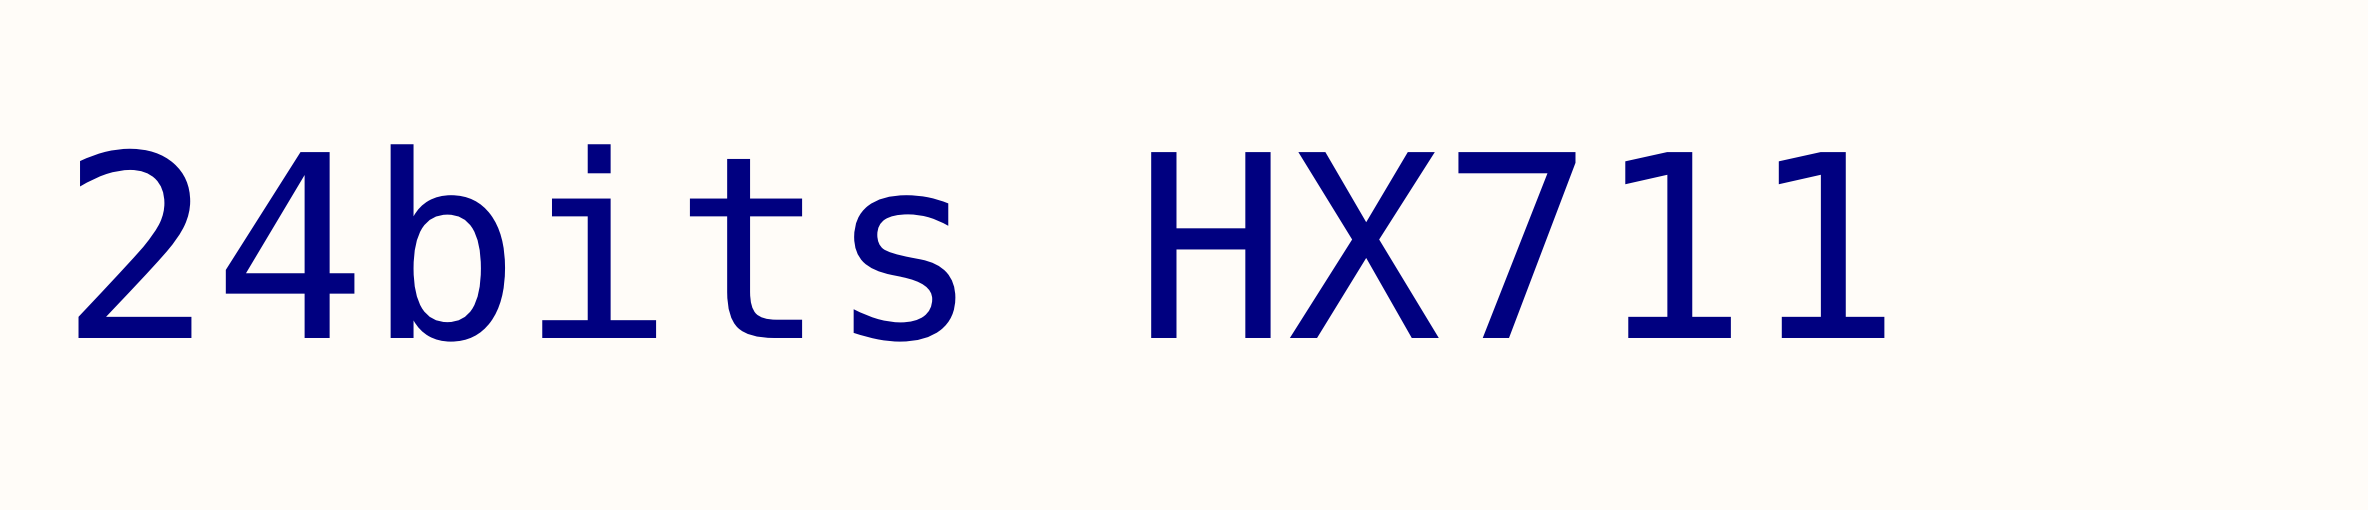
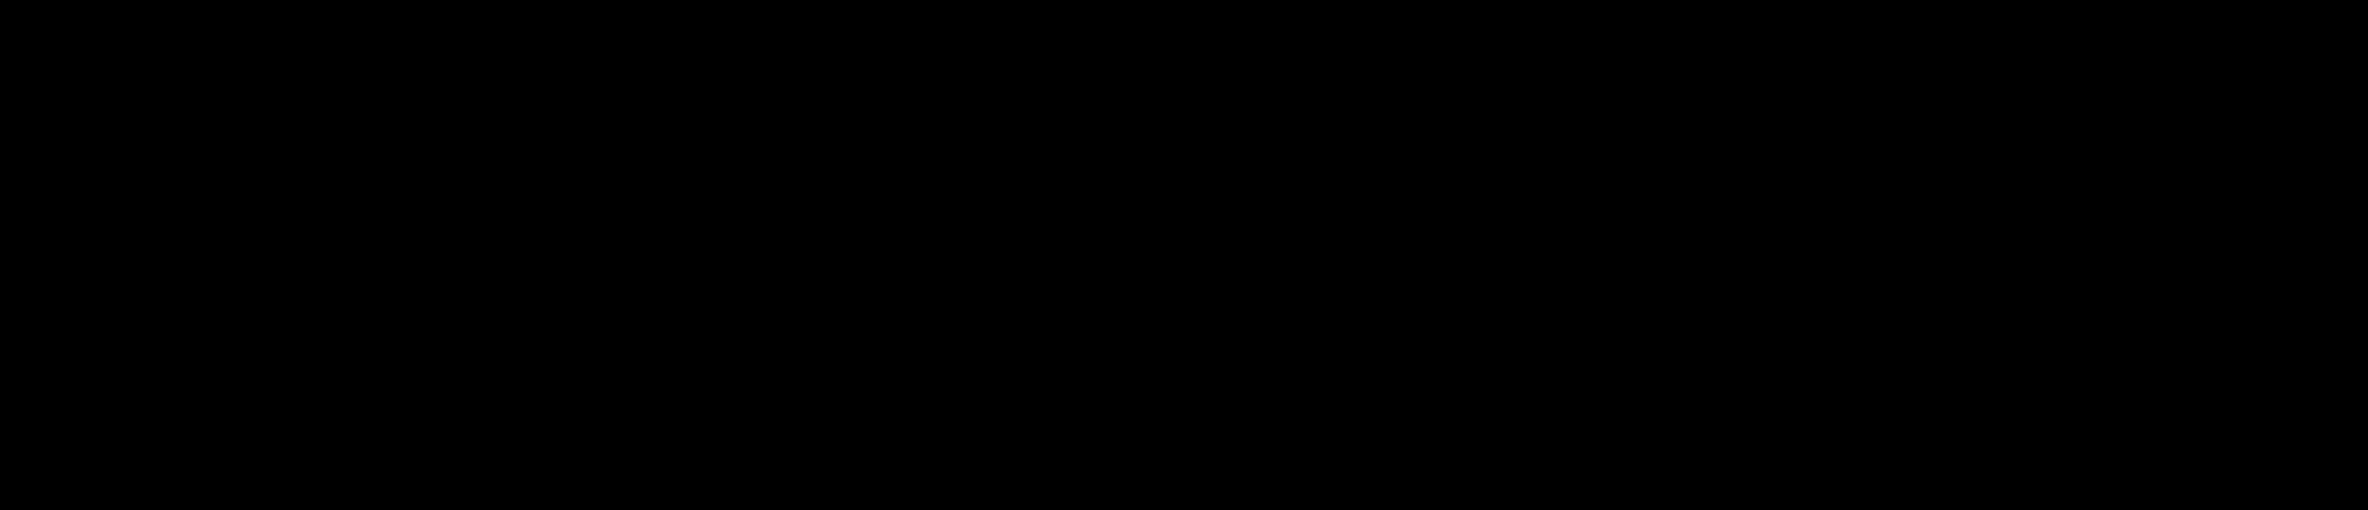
text: 24bits HX711 (981, 242) -> none

